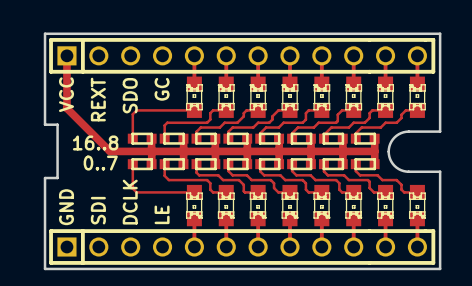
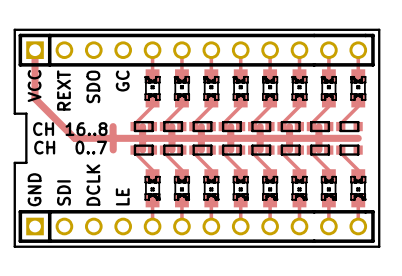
track: (194, 110) (136, 110) (132, 114) (132, 138) -> none
track: (226, 110) (213, 110) (207, 122) (167, 122) (164, 125) (164, 138) -> none
track: (258, 110) (246, 110) (237, 122) (224, 122) (219, 127) (200, 127) (196, 131) (196, 138) -> none
track: (289, 110) (278, 110) (269, 122) (258, 122) (253, 127) (232, 127) (228, 131) (228, 138) -> none
track: (321, 110) (308, 110) (302, 122) (283, 122) (278, 127) (266, 127) (260, 133) (260, 138) -> none
track: (353, 110) (342, 110) (337, 114) (336, 122) (318, 122) (313, 127) (297, 127) (292, 133) (292, 138) -> none
track: (385, 110) (372, 110) (369, 113) (369, 117) (364, 122) (353, 122) (348, 127) (331, 127) (323, 134) (323, 138) -> none
track: (417, 110) (405, 110) (396, 122) (385, 122) (380, 127) (361, 127) (355, 133) (355, 138) -> none
track: none -> (152, 106) (135, 123) (135, 126)
track: none -> (181, 106) (164, 123) (164, 126)
track: none -> (211, 106) (193, 123) (193, 126)
track: none -> (240, 106) (223, 123) (223, 126)
track: none -> (270, 106) (252, 123) (252, 126)
track: none -> (299, 106) (282, 123) (282, 126)
track: none -> (328, 106) (311, 123) (311, 126)
track: none -> (358, 106) (340, 123) (340, 126)
board edge: (440, 131) (401, 133) (392, 139) (388, 151) (391, 161) (401, 170) (440, 171) -> (379, 120) (379, 157)
part: (142, 138) -> none
part: (174, 138) -> none
part: none -> (143, 126)
part: (205, 138) -> none
part: none -> (173, 126)
part: (237, 138) -> none
part: none -> (202, 126)
part: (269, 138) -> none
part: none -> (231, 126)
part: (301, 138) -> none
part: none -> (261, 126)
part: (333, 138) -> none
part: none -> (290, 126)
part: (365, 138) -> none
part: none -> (320, 126)
part: none -> (349, 126)
text: 16..8 (95, 142) -> CH 16..8 (70, 129)
track: none -> (318, 138) (358, 138)
text: 0..7 (100, 163) -> CH 0..7 (70, 147)
track: (132, 164) (132, 188) (136, 192) (194, 192) -> none
part: (142, 164) -> none
track: (164, 164) (164, 175) (168, 180) (207, 180) (213, 192) (226, 192) -> none
part: (174, 164) -> none
track: none -> (135, 150) (135, 152) (152, 170)
part: none -> (143, 150)
track: (196, 164) (196, 172) (199, 175) (218, 175) (223, 180) (239, 180) (243, 184) (244, 192) (258, 192) -> none
part: (205, 164) -> none
track: none -> (164, 150) (164, 152) (181, 170)
part: none -> (173, 150)
track: (228, 164) (228, 171) (232, 175) (246, 175) (251, 180) (270, 180) (278, 192) (289, 192) -> none
part: (237, 164) -> none
track: none -> (193, 150) (193, 152) (211, 170)
part: none -> (202, 150)
track: (260, 164) (260, 171) (264, 175) (280, 175) (285, 180) (302, 180) (308, 192) (321, 192) -> none
part: (269, 164) -> none
track: none -> (223, 150) (223, 152) (240, 170)
part: none -> (231, 150)
track: (292, 164) (292, 171) (296, 175) (310, 175) (315, 180) (336, 180) (342, 192) (353, 192) -> none
part: (301, 164) -> none
track: none -> (252, 150) (252, 152) (270, 170)
part: none -> (261, 150)
track: (323, 164) (323, 171) (327, 175) (344, 175) (348, 180) (368, 180) (369, 188) (374, 192) (385, 192) -> none
part: (333, 164) -> none
track: none -> (282, 150) (282, 152) (299, 170)
part: none -> (290, 150)
track: (355, 164) (355, 171) (360, 175) (377, 175) (382, 180) (396, 180) (401, 184) (401, 189) (404, 192) (417, 192) -> none
part: (365, 164) -> none
track: none -> (311, 150) (311, 152) (328, 170)
part: none -> (320, 150)
track: none -> (340, 150) (340, 152) (358, 170)
part: none -> (349, 150)

